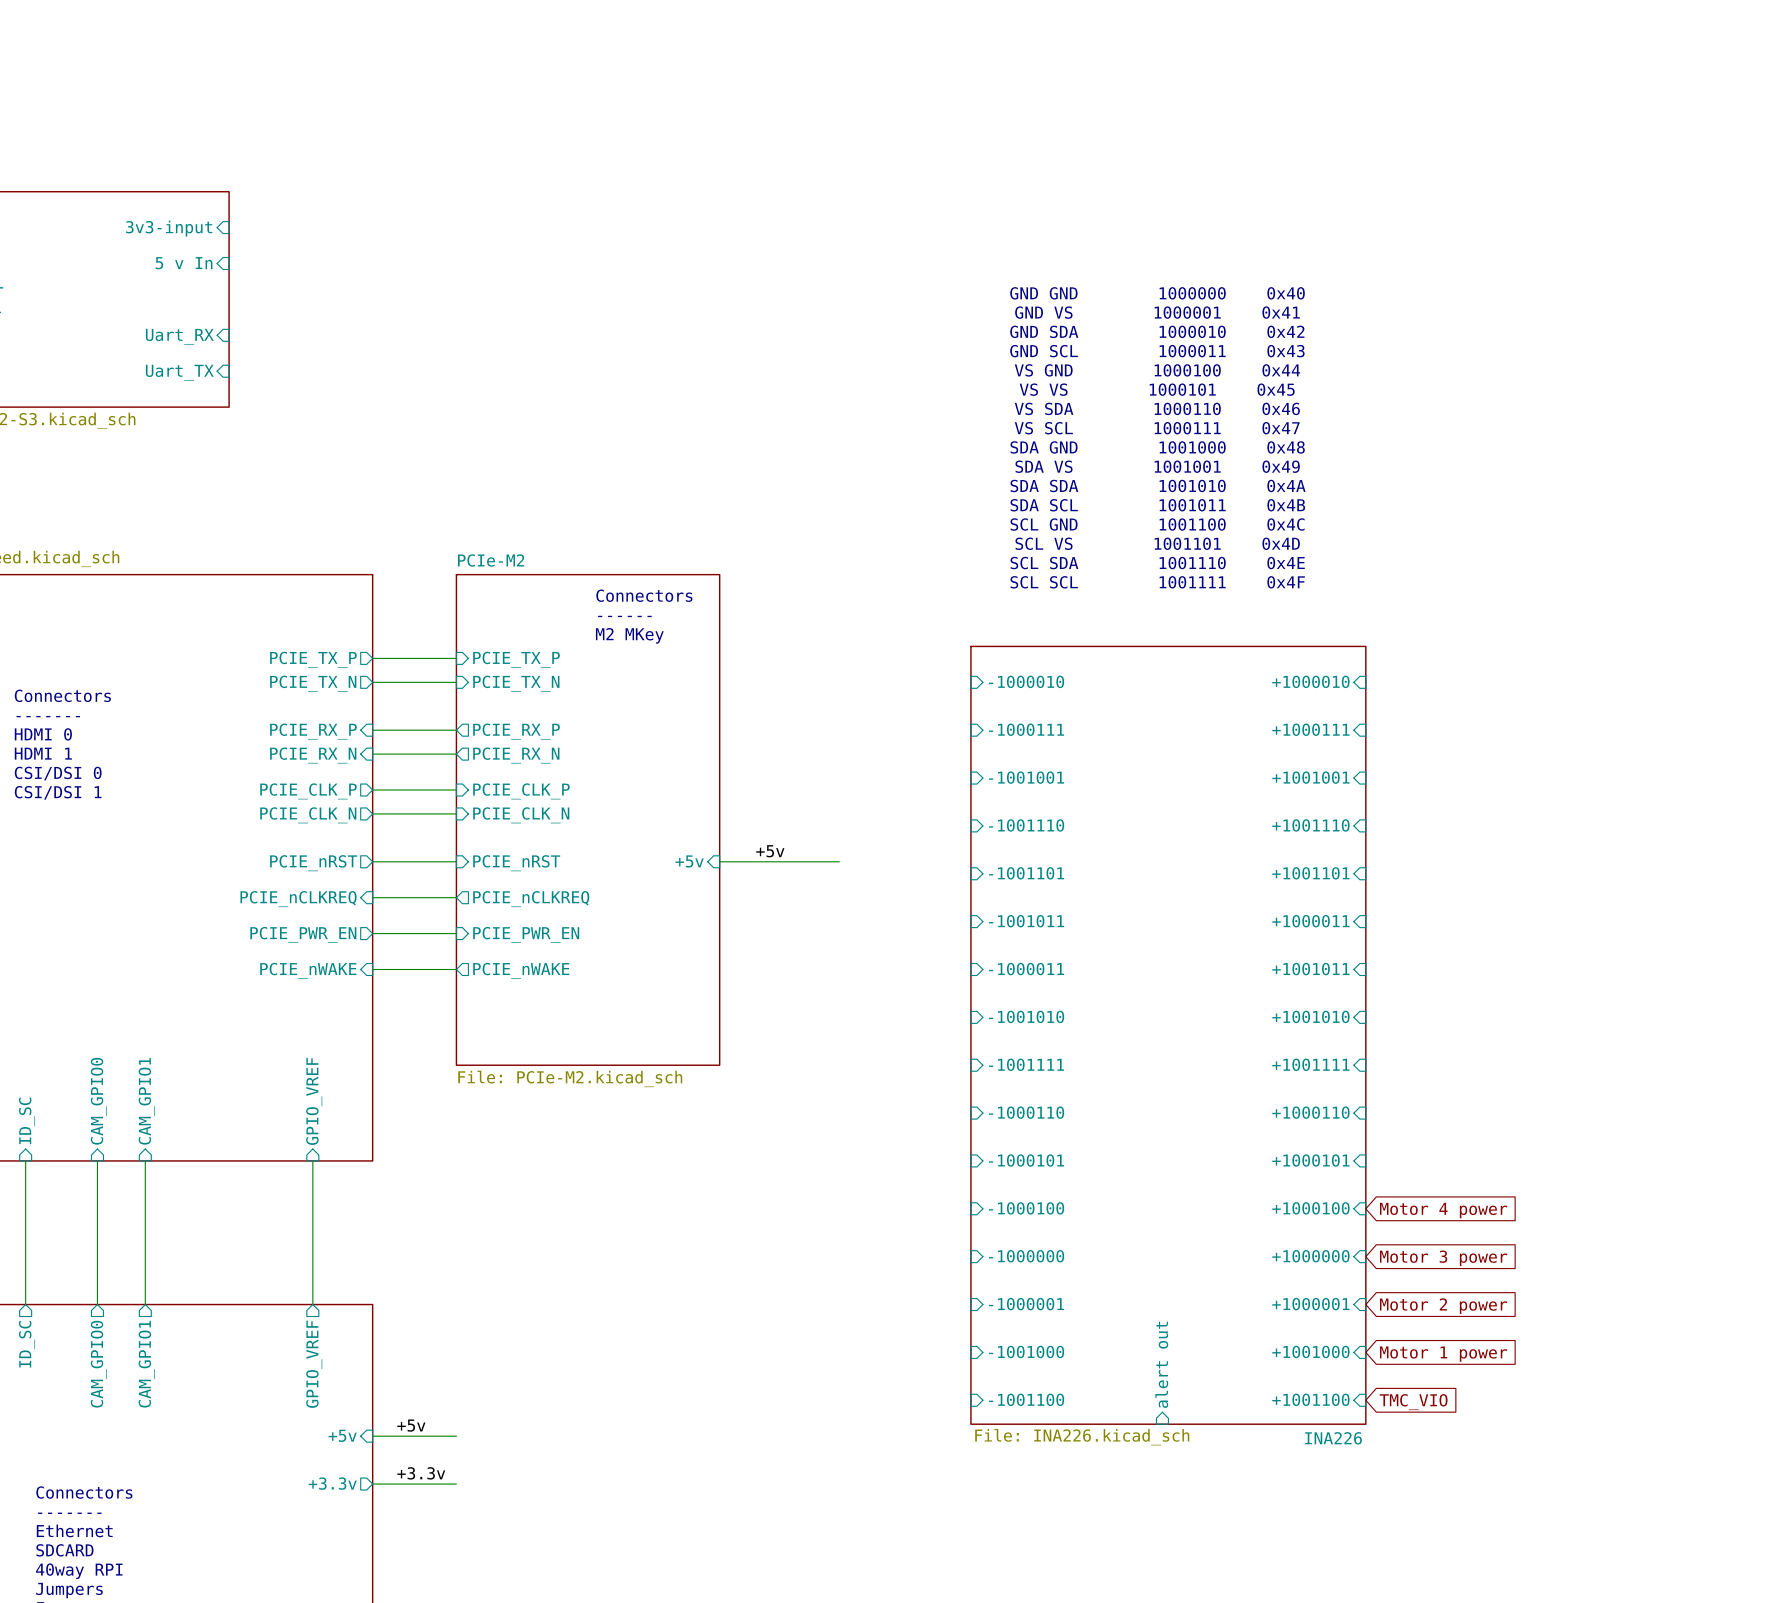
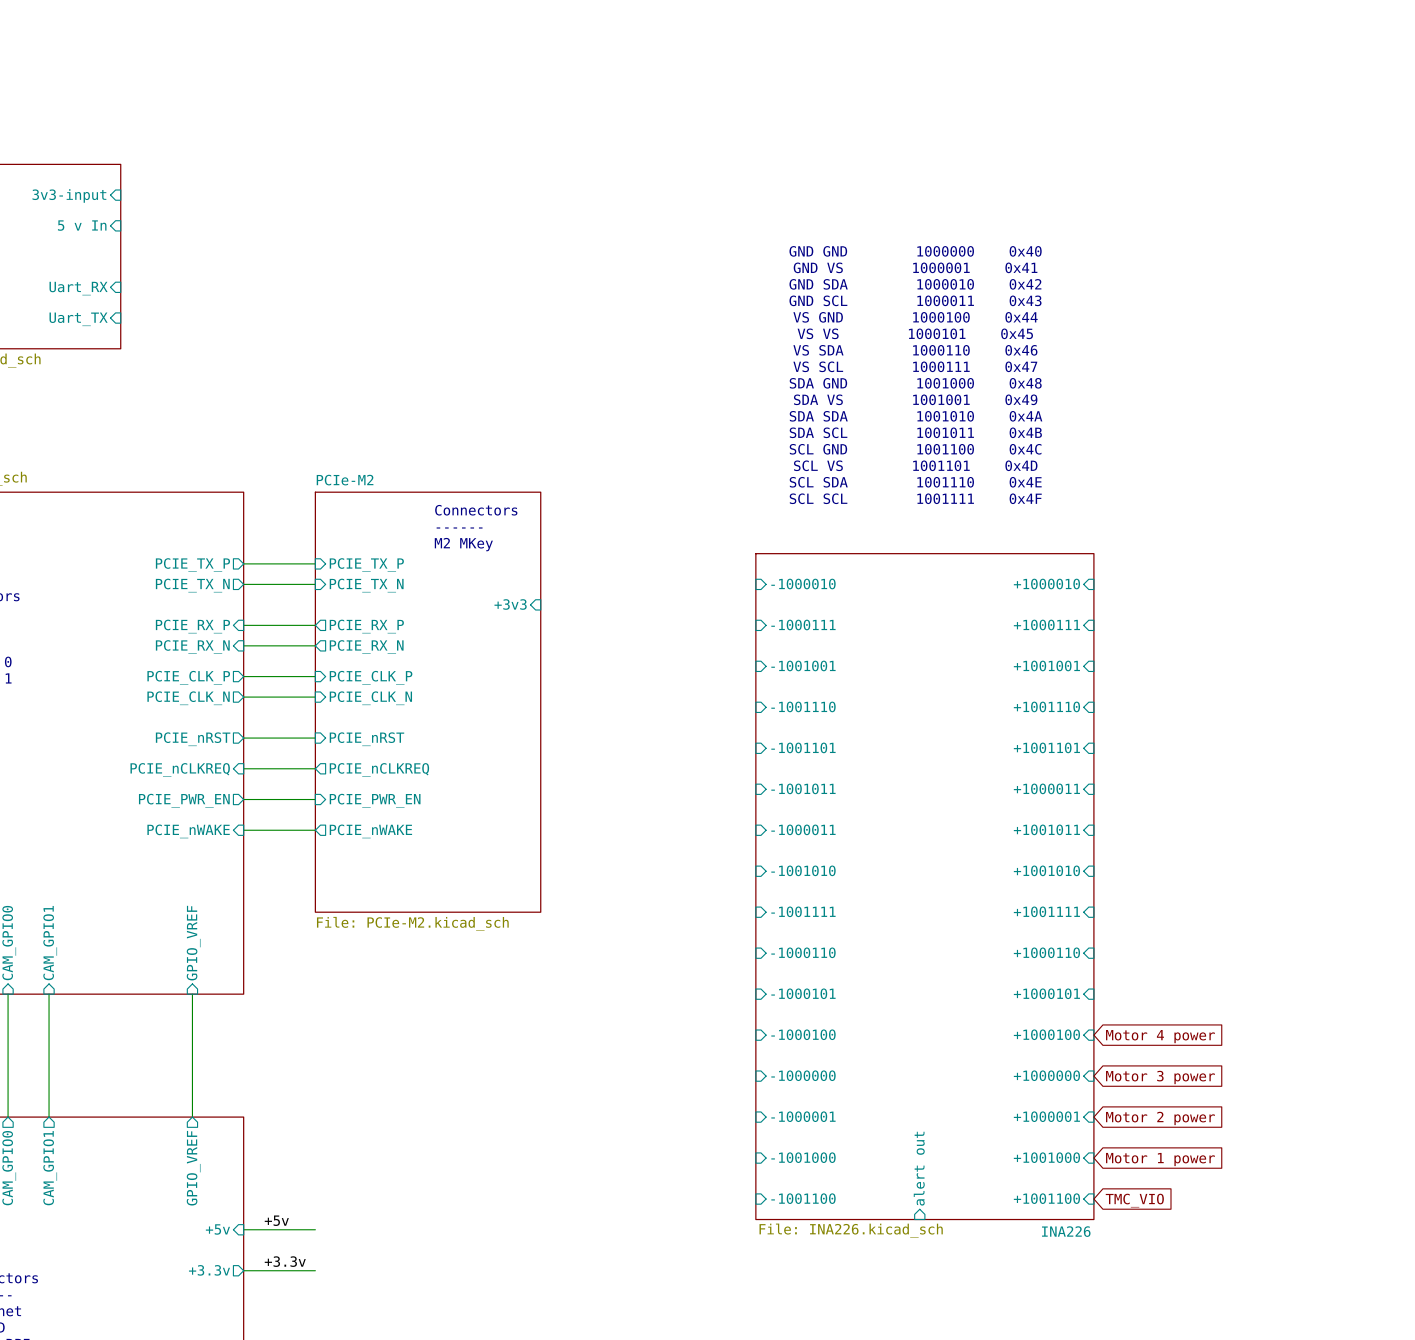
sheet pin: none -> +3v3 (510, 604)
label: +5v (770, 851) -> none
sheet pin: +5v (689, 861) -> none
wire: (719, 861) (839, 861) -> none

